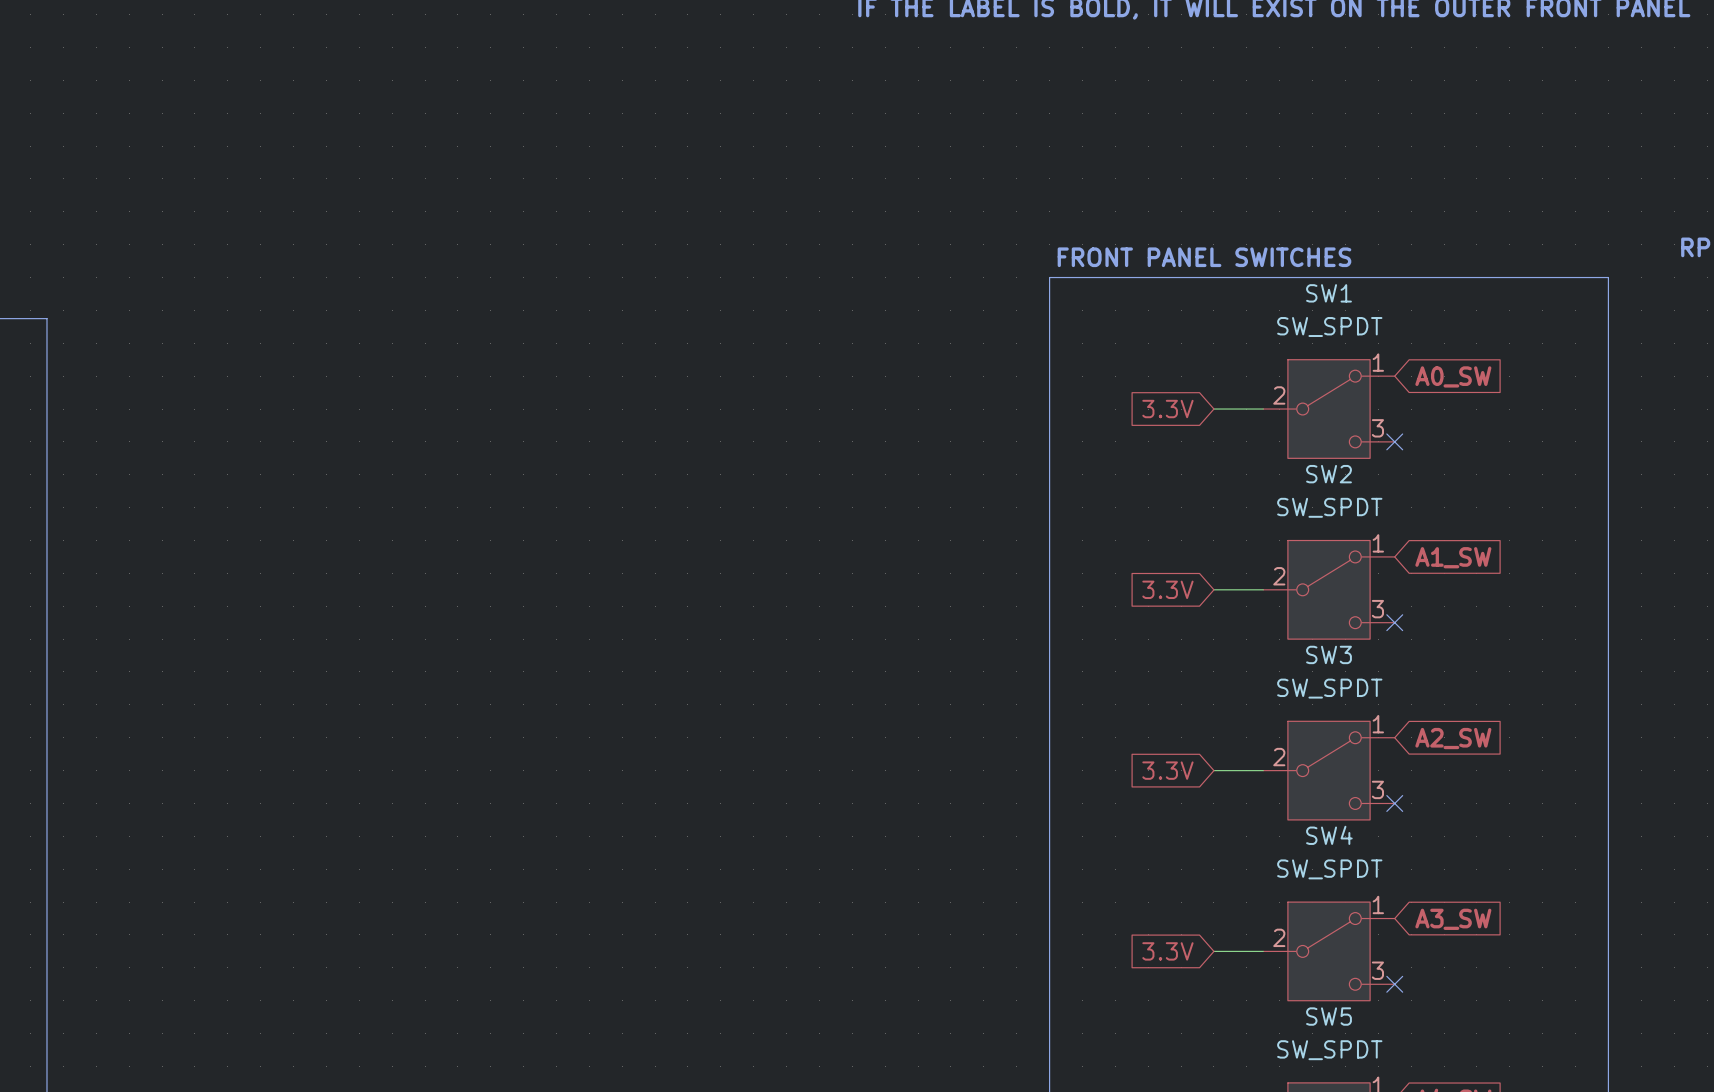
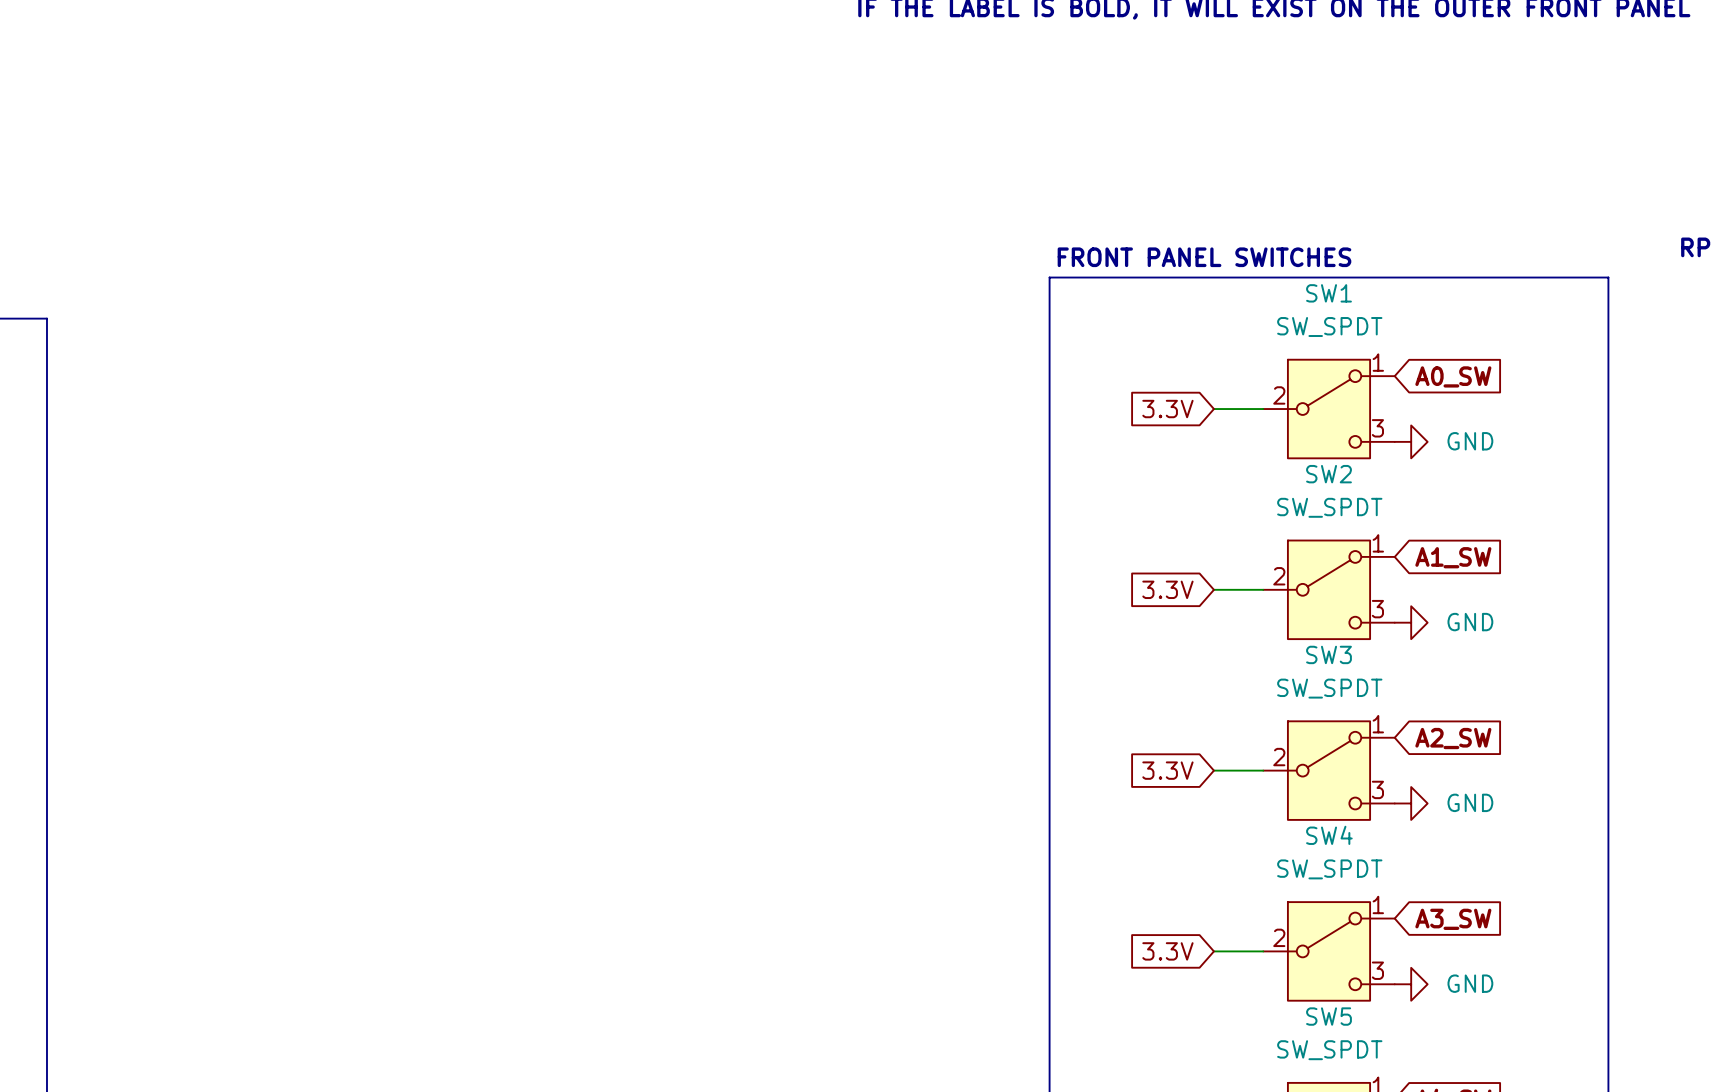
no-connect mark: (1394, 441) -> none
power symbol: none -> GND (1411, 441)
no-connect mark: (1394, 622) -> none
power symbol: none -> GND (1411, 622)
no-connect mark: (1394, 803) -> none
power symbol: none -> GND (1411, 803)
no-connect mark: (1394, 984) -> none
power symbol: none -> GND (1411, 984)

